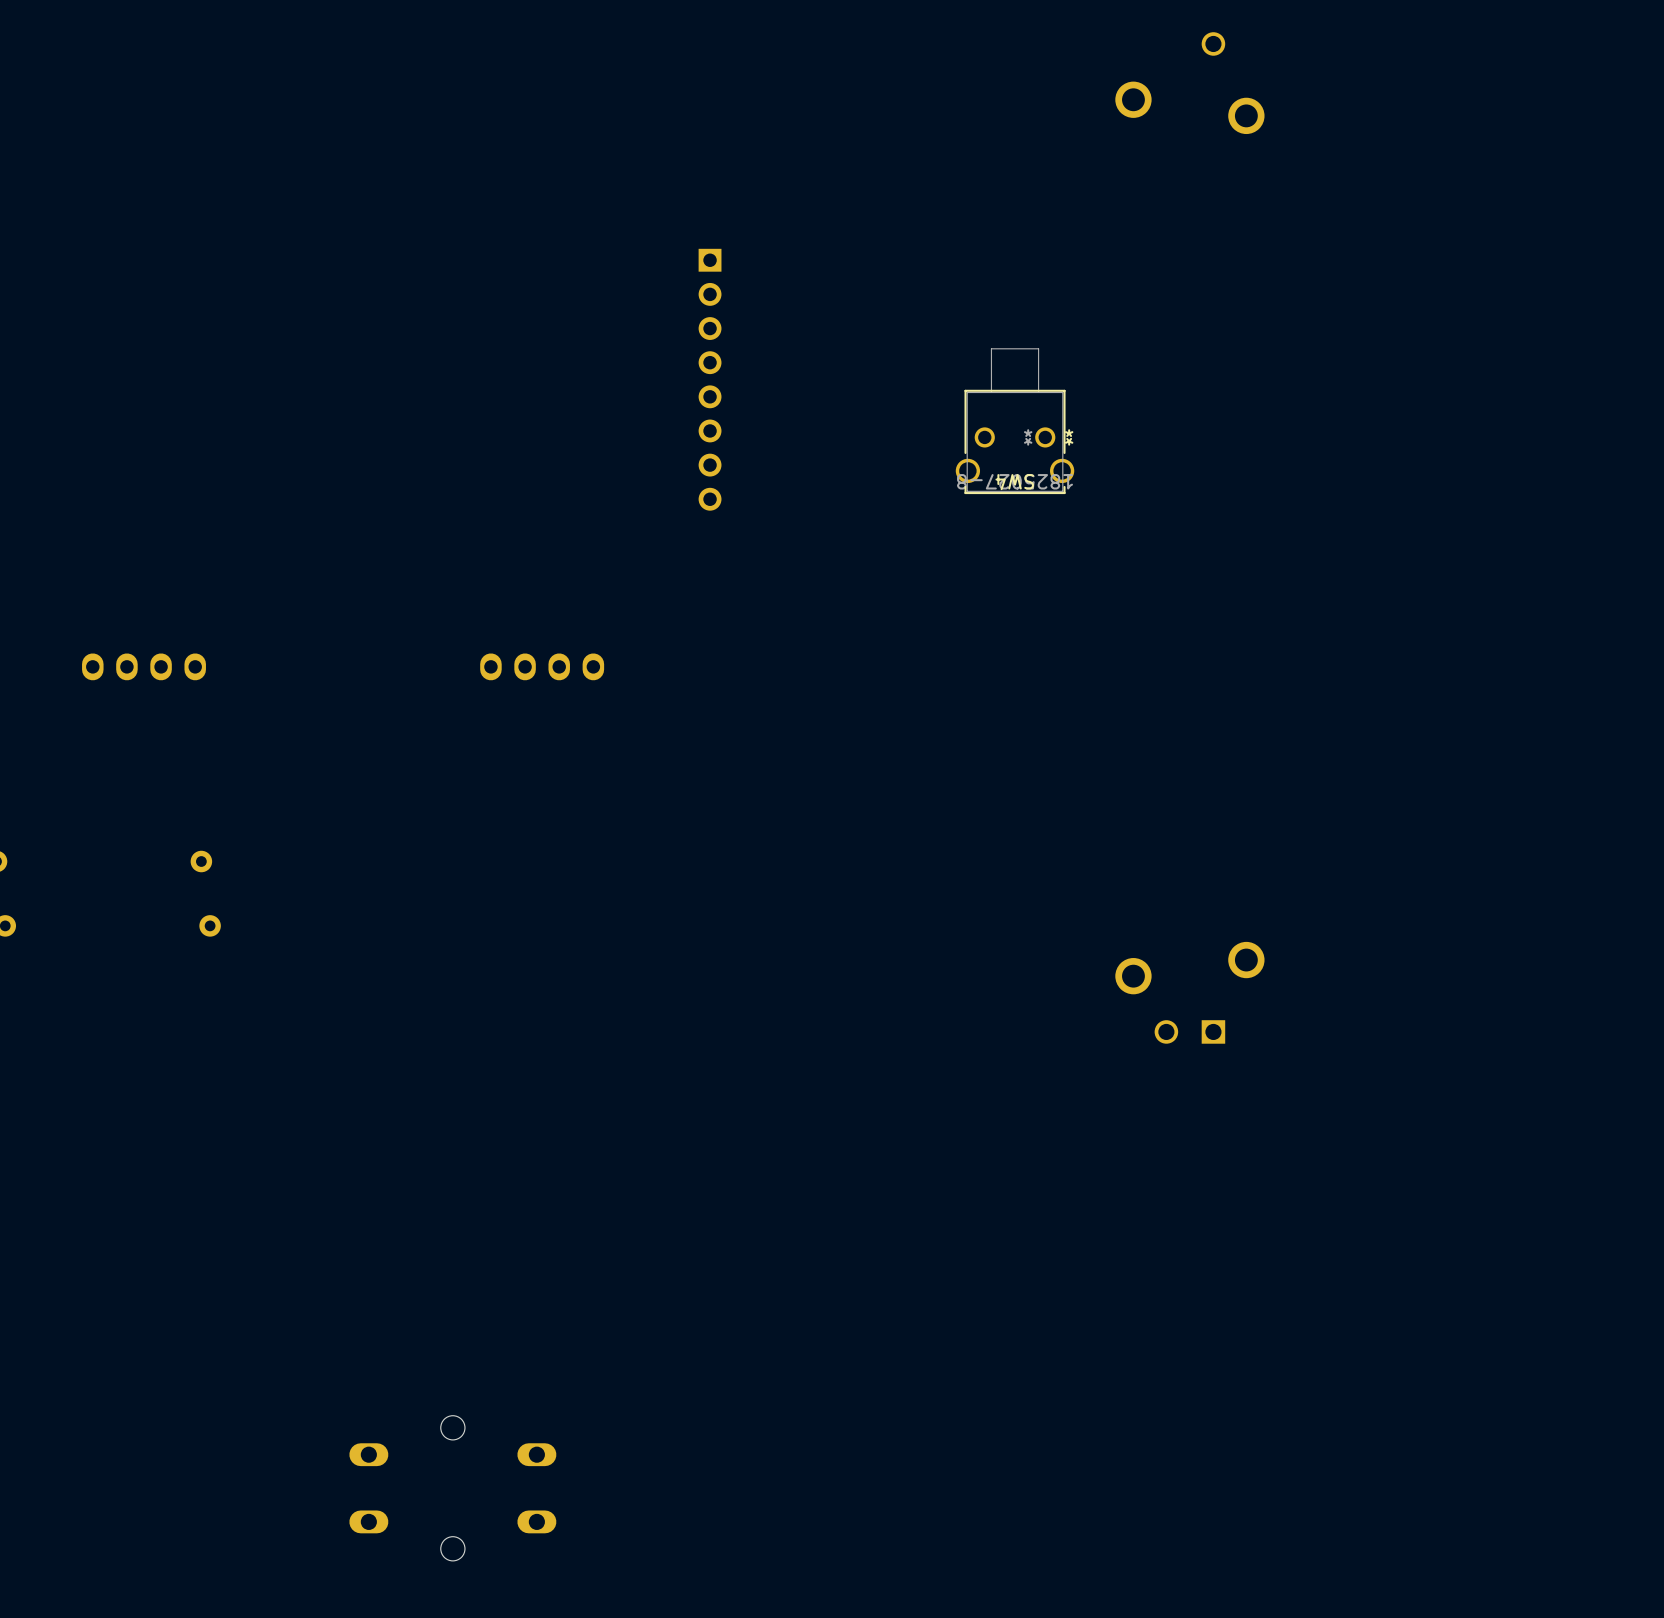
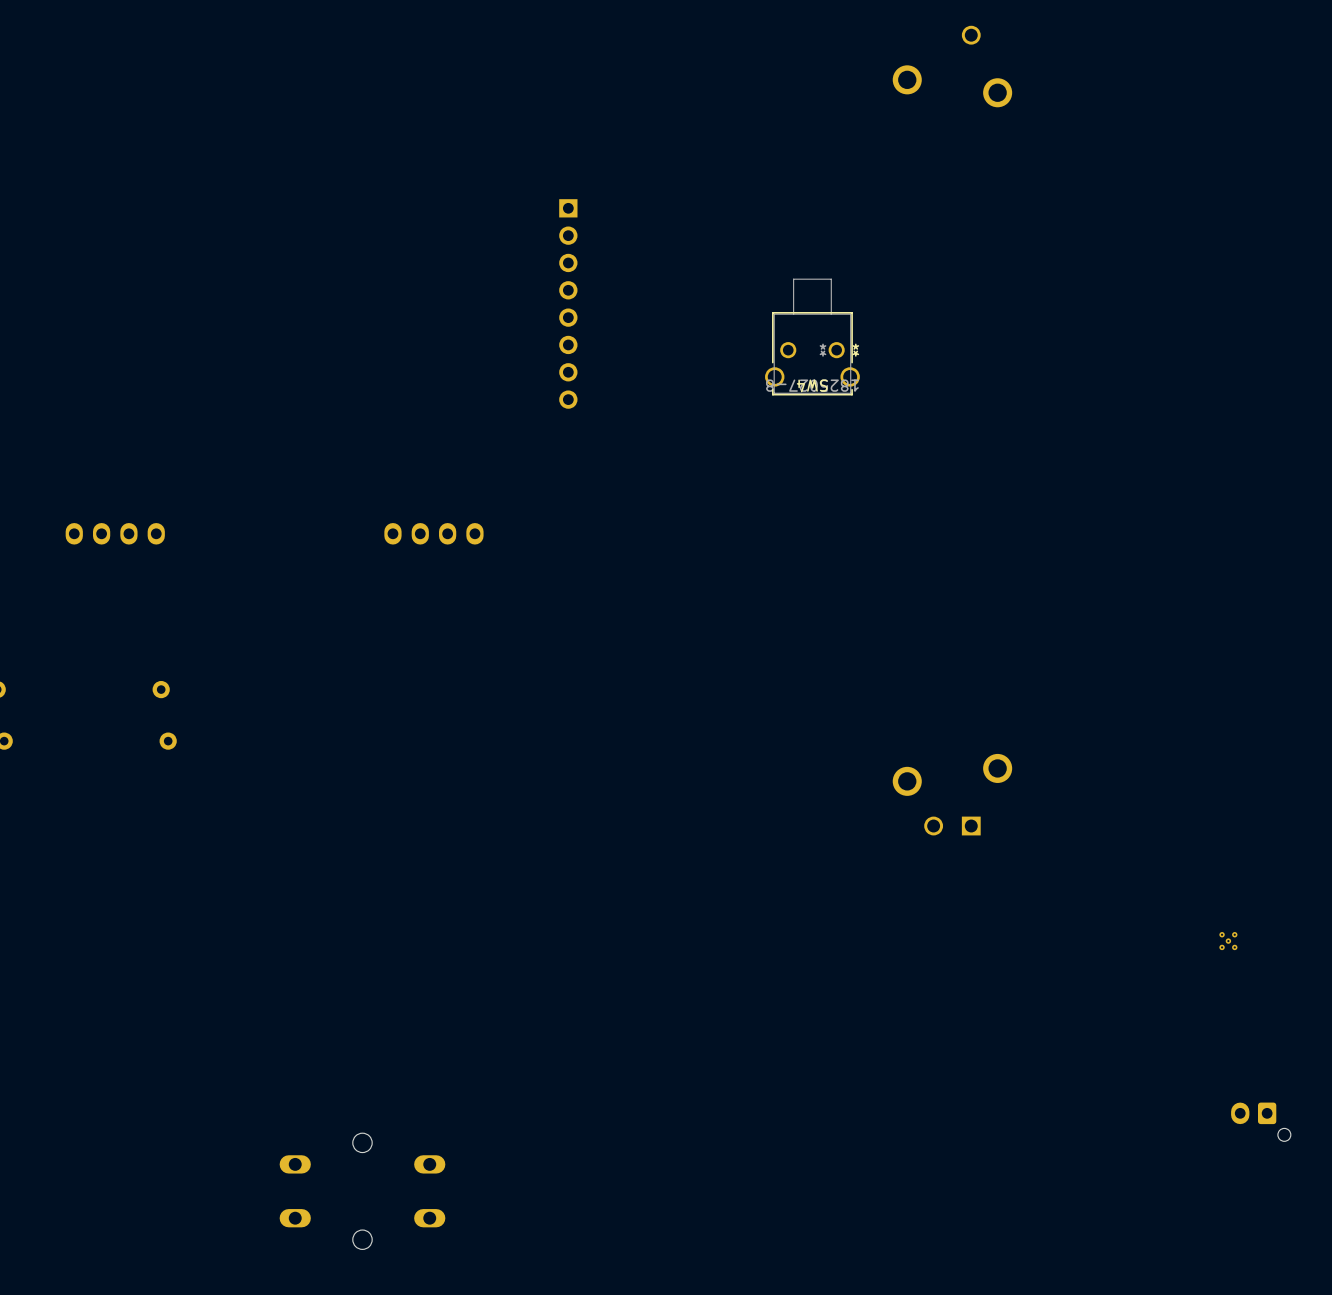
part: none -> (1228, 941)
part: none -> (1260, 1121)

